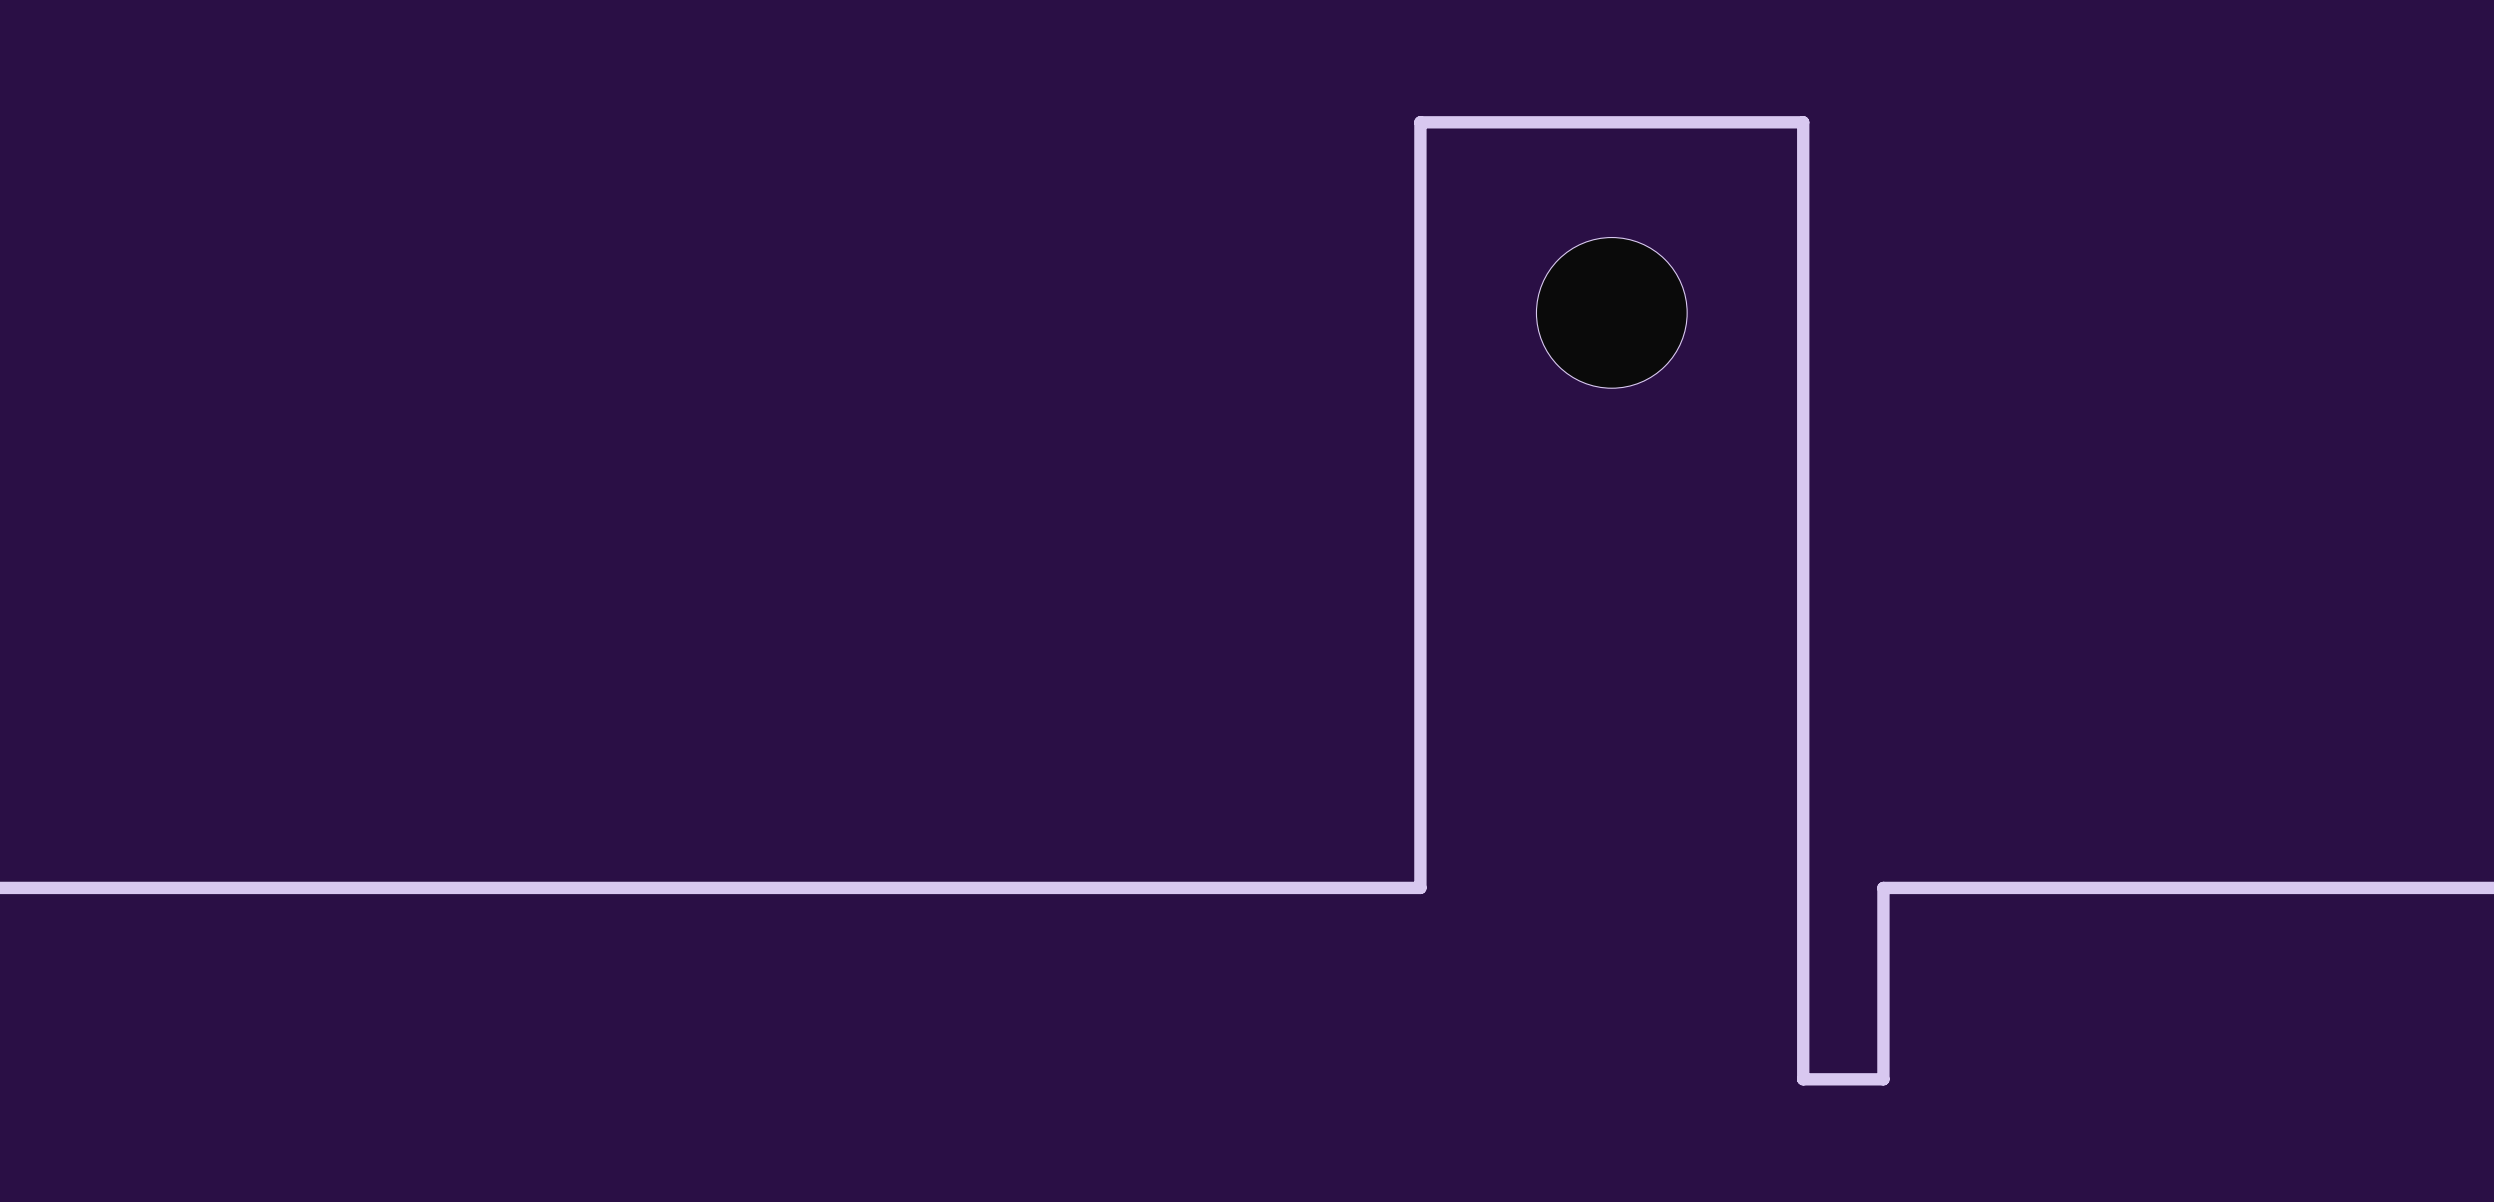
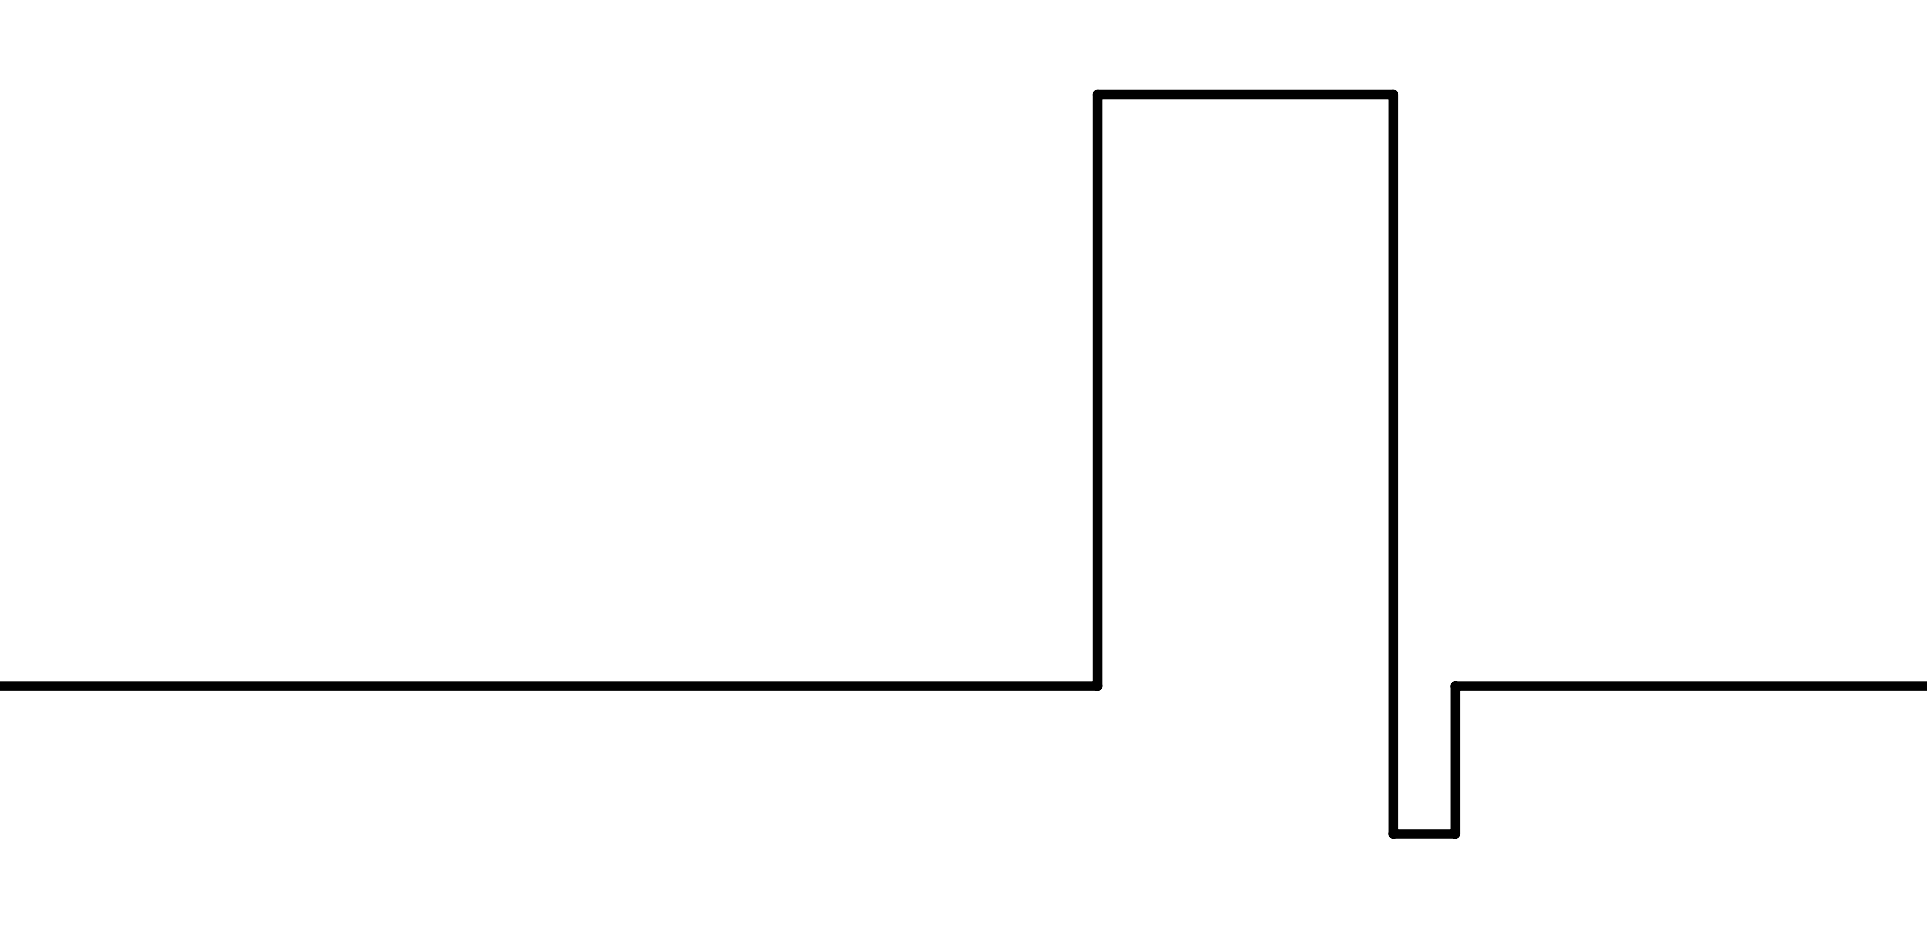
part: (1611, 312) -> none

